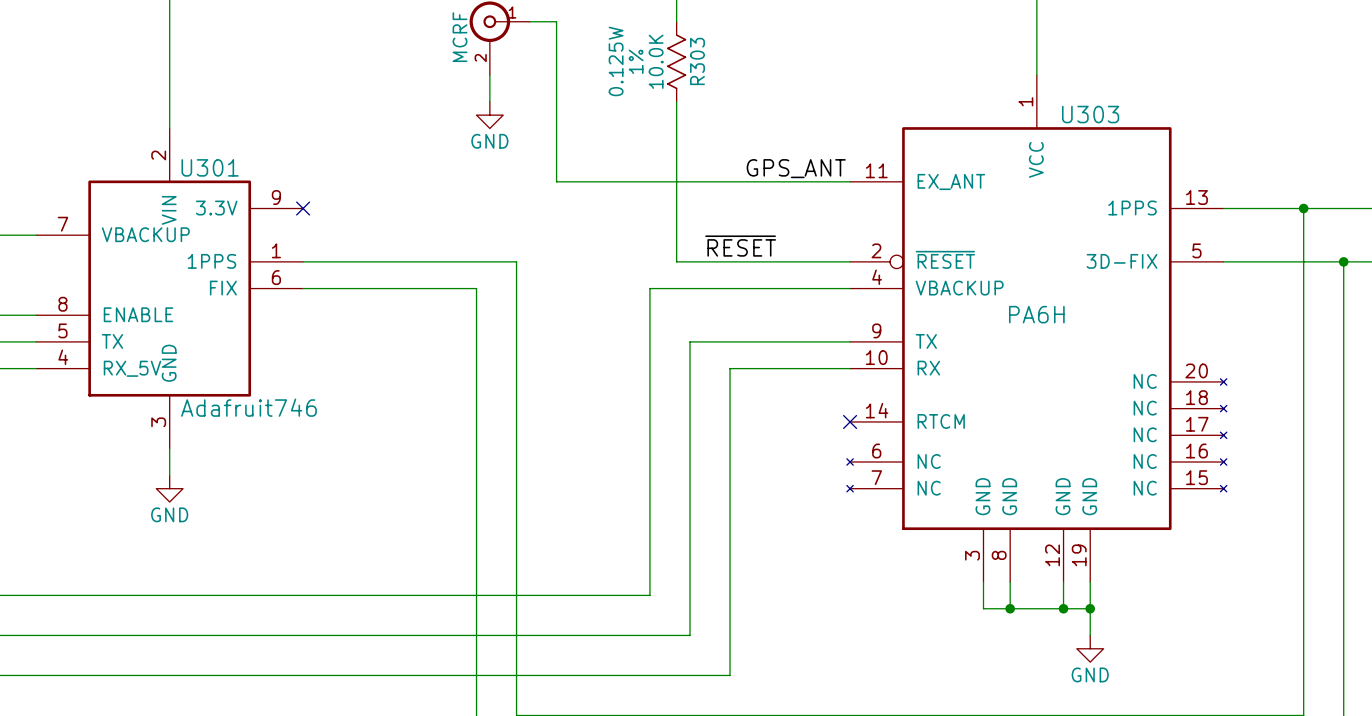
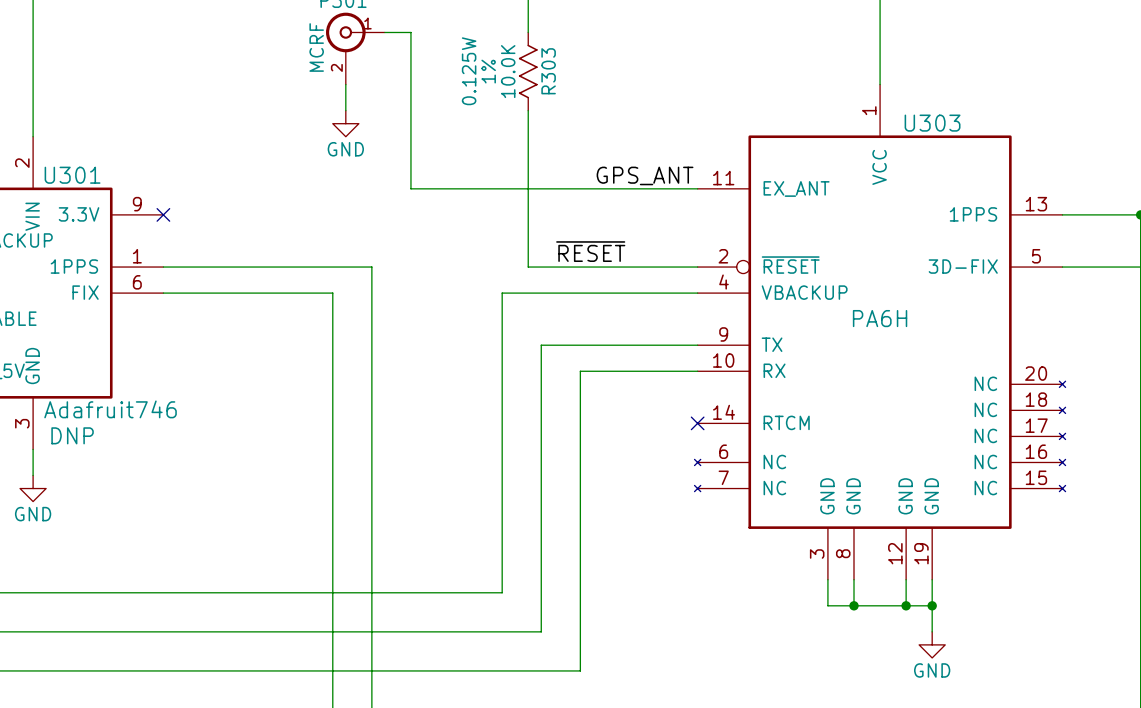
U301 text: none -> DNP (72, 435)

